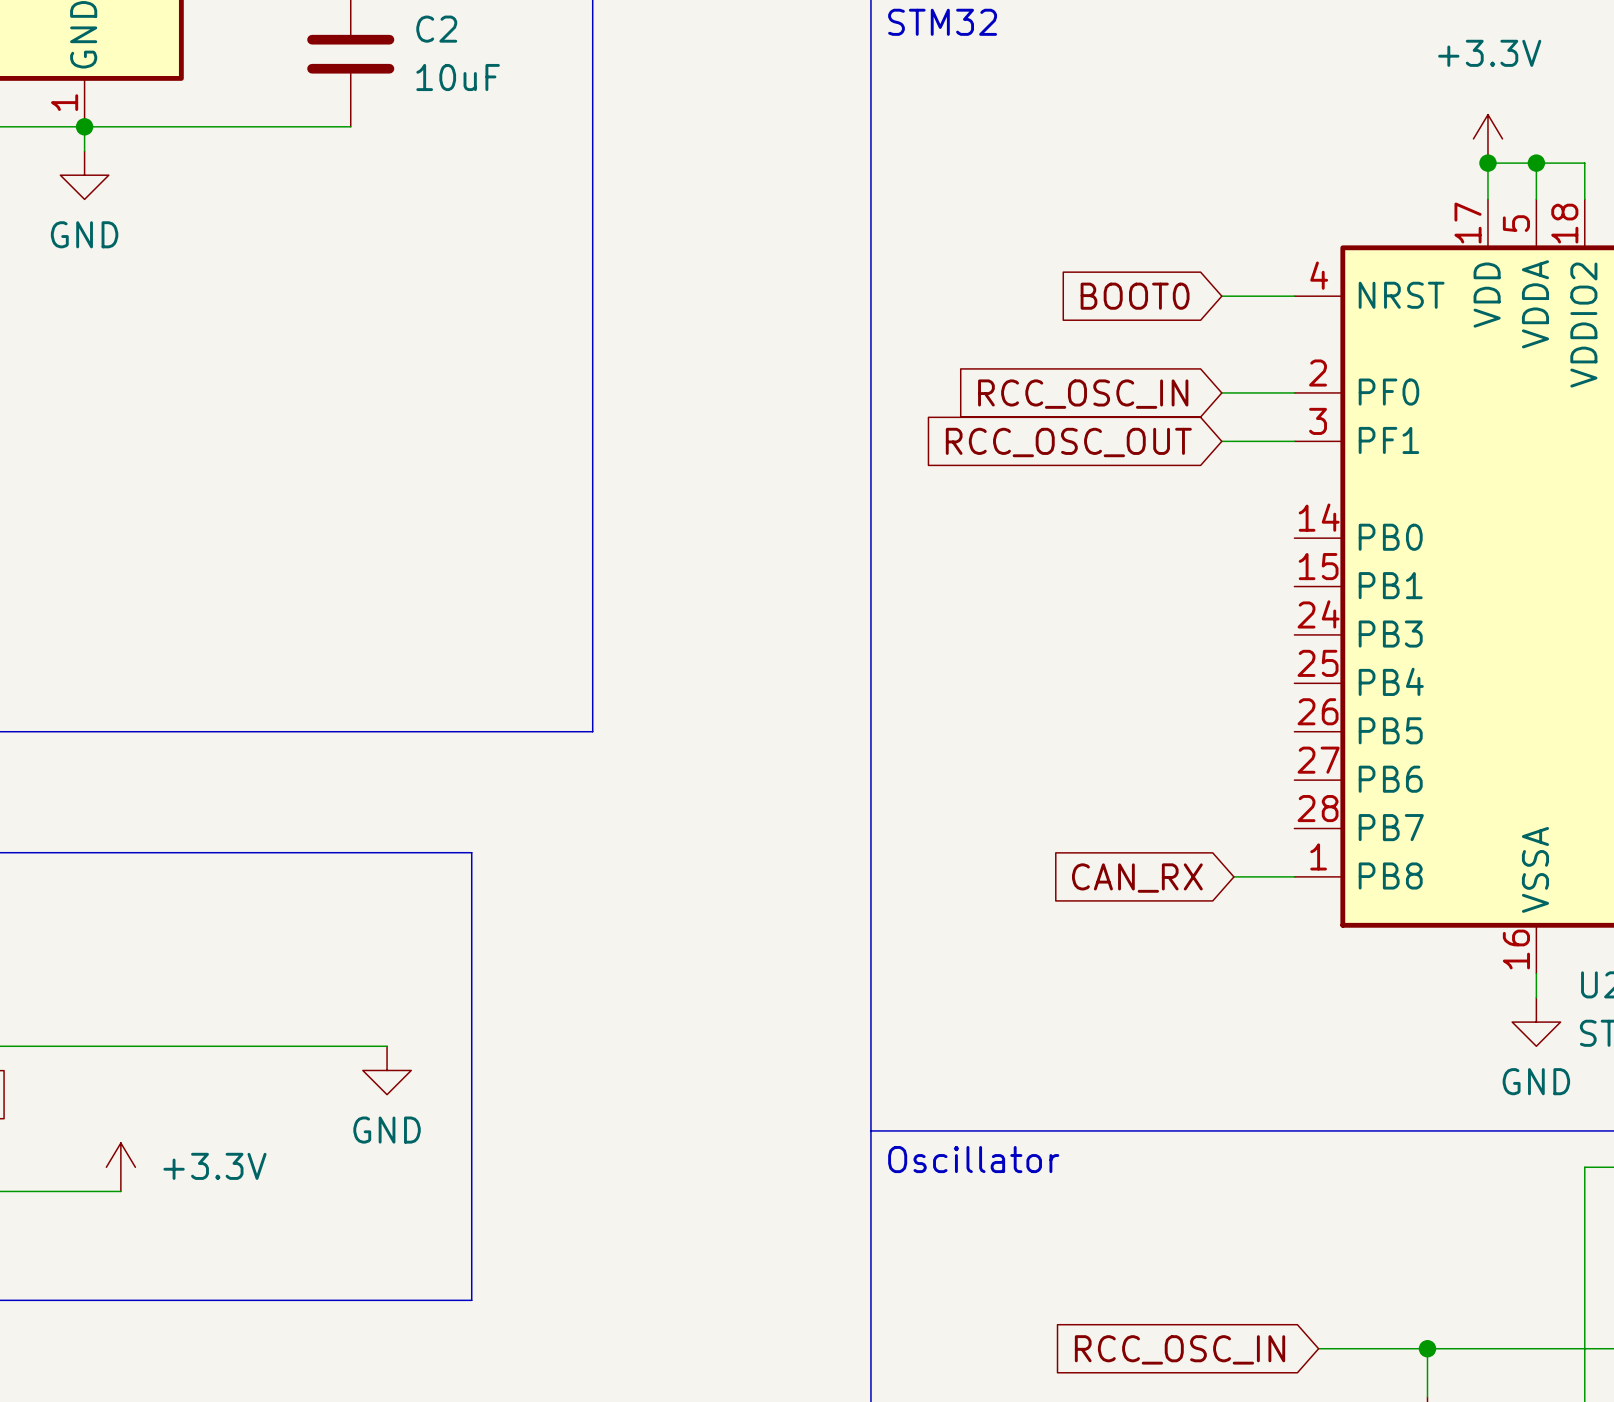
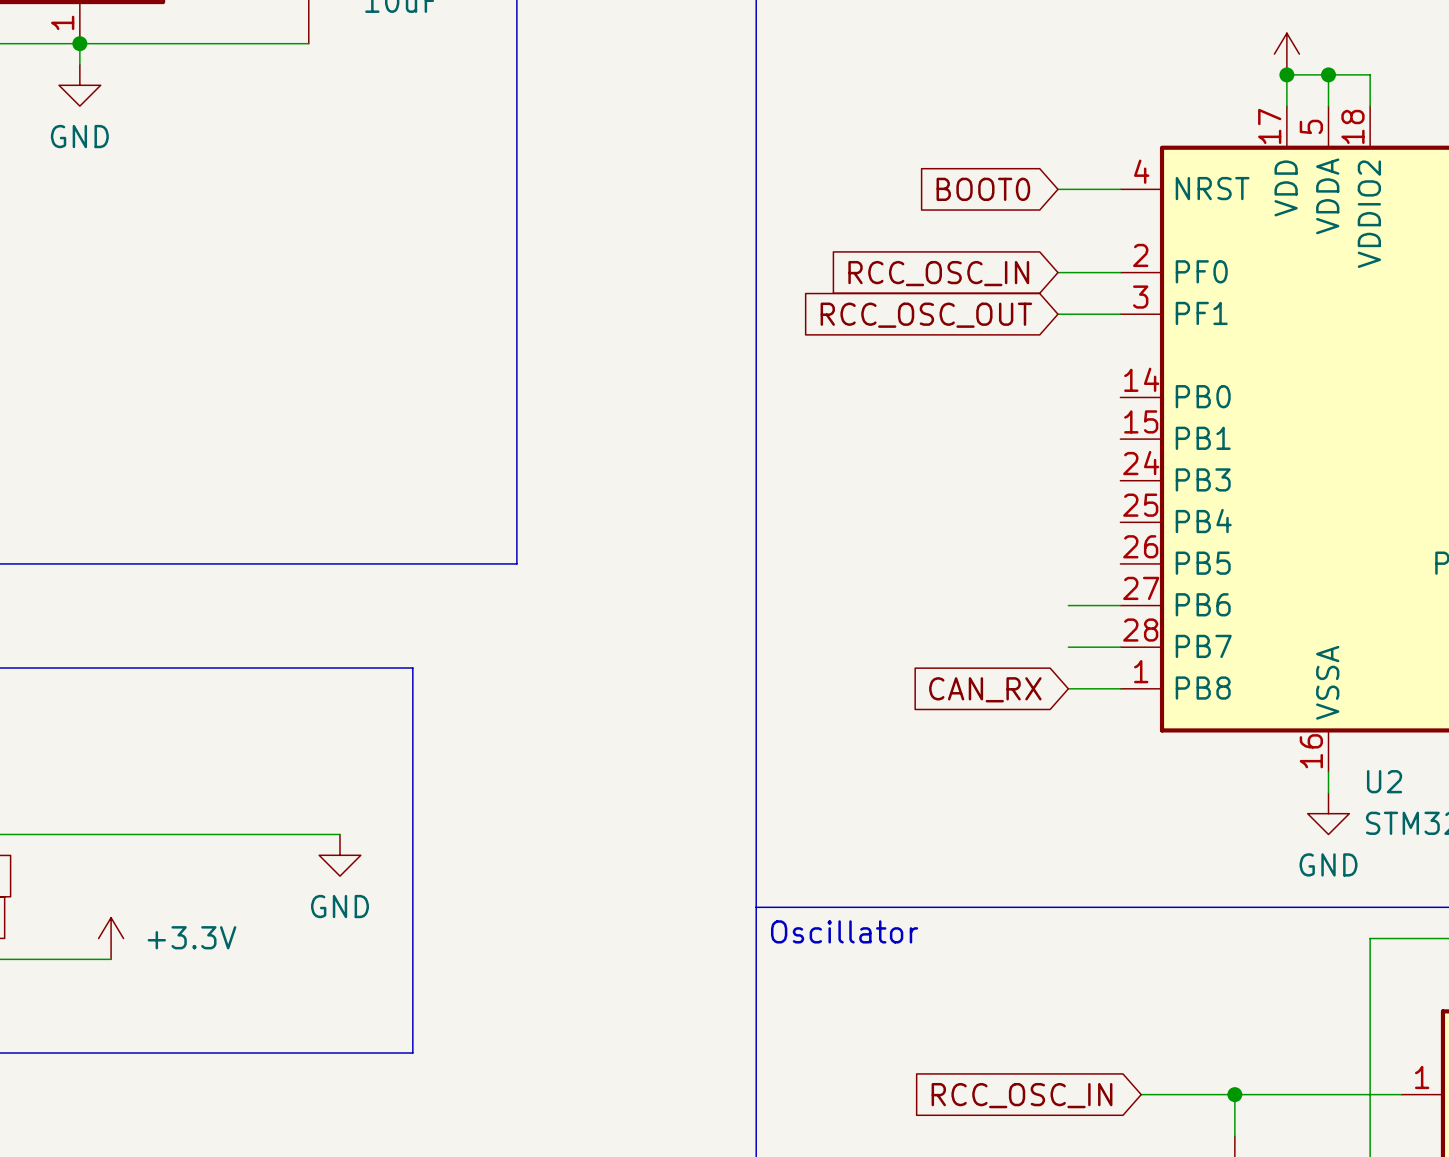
wire: none -> (1068, 605) (1120, 605)
wire: none -> (1068, 647) (1120, 647)

